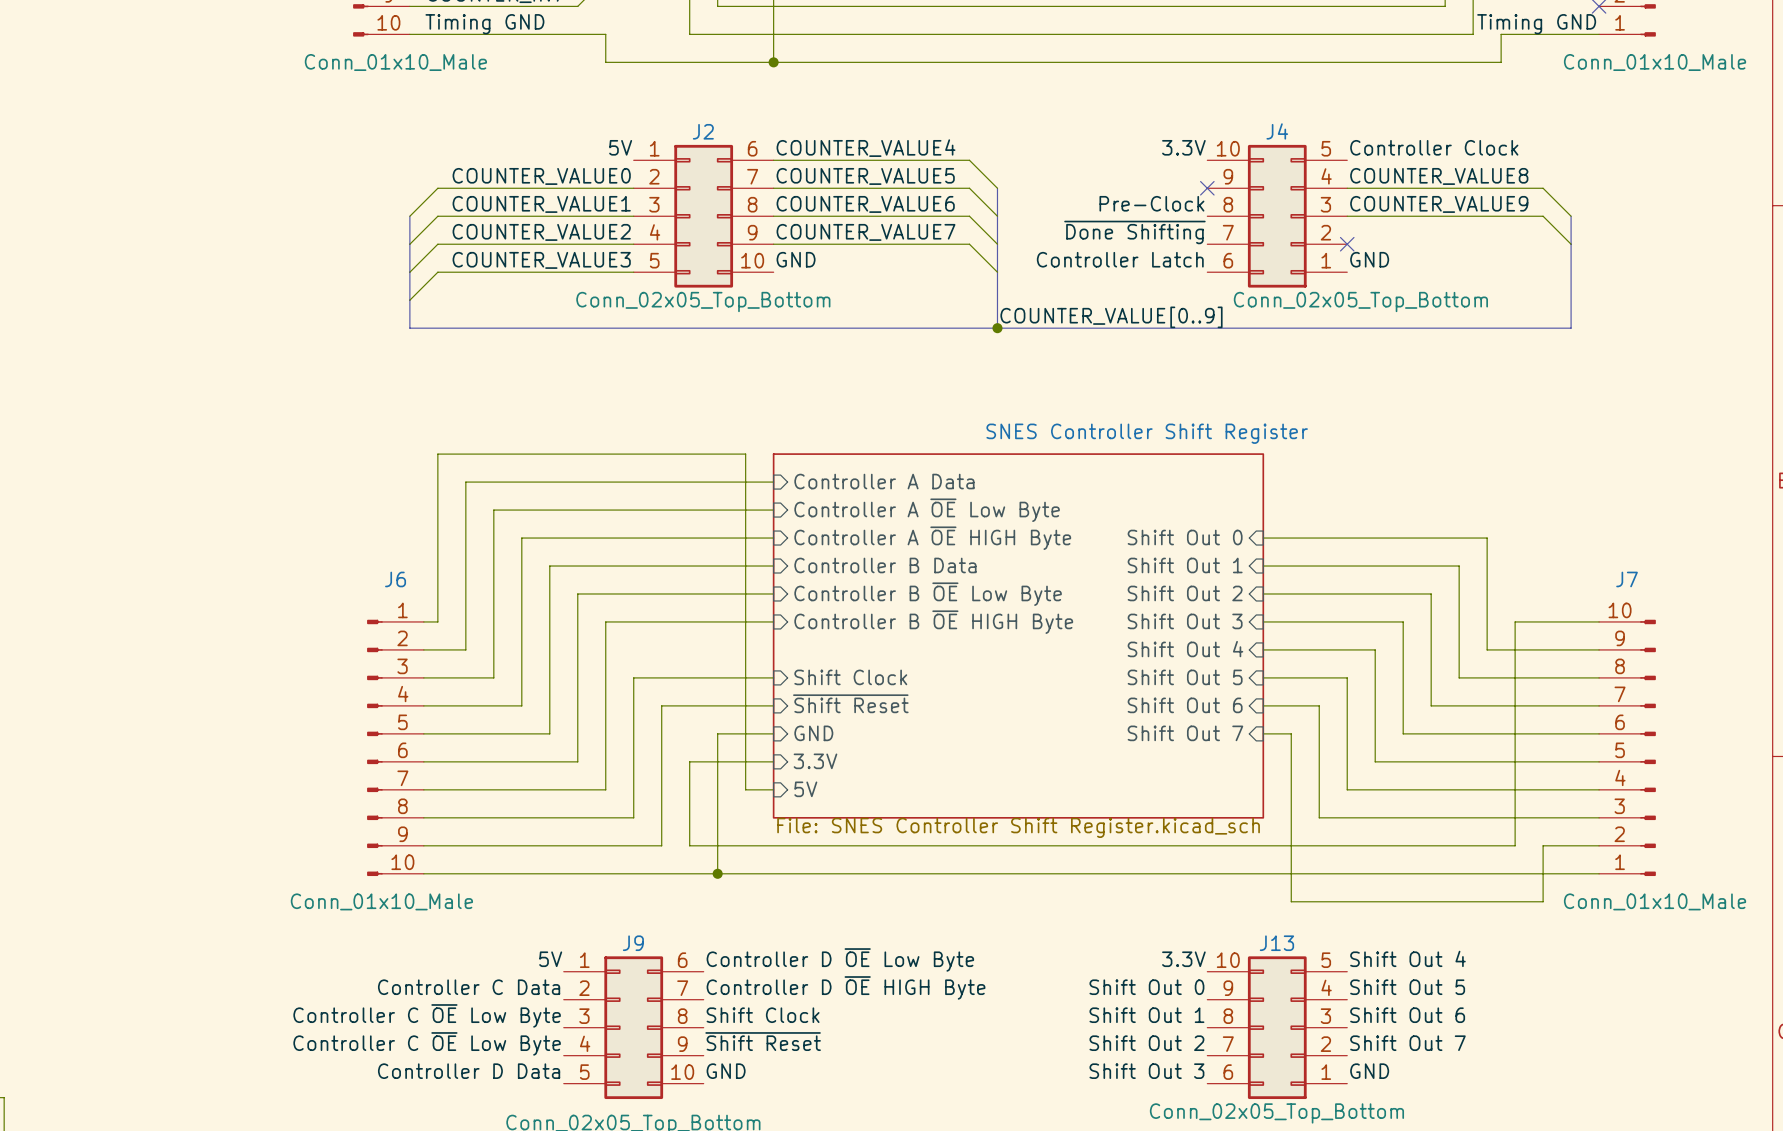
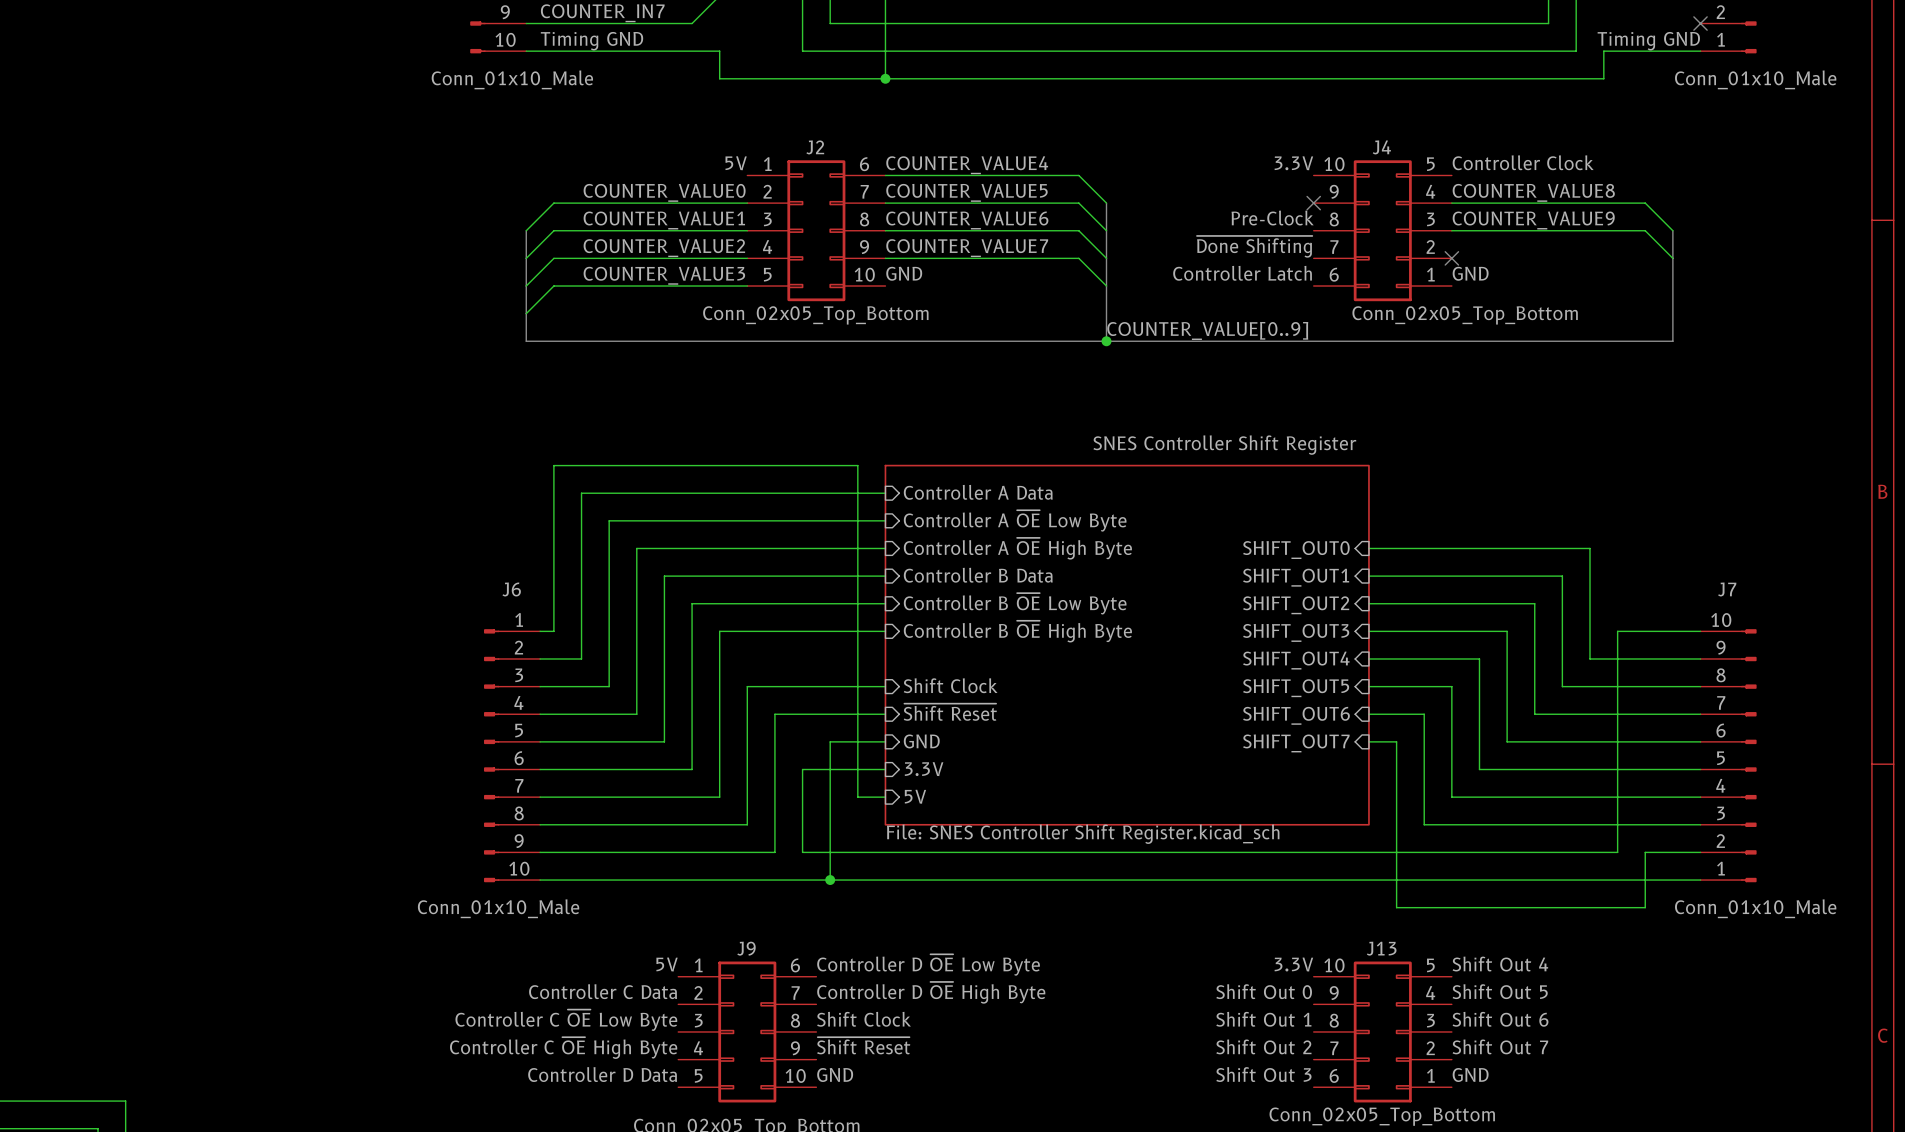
sheet pin: Shift Out 0 (1185, 537) -> SHIFT_OUT0 (1296, 550)
sheet pin: Controller A ~{OE} HIGH Byte (932, 538) -> Controller A ~{OE} High Byte (1017, 548)
sheet pin: Shift Out 1 (1185, 565) -> SHIFT_OUT1 (1296, 577)
sheet pin: Shift Out 2 (1185, 593) -> SHIFT_OUT2 (1296, 605)
sheet pin: Shift Out 3 (1185, 621) -> SHIFT_OUT3 (1296, 632)
sheet pin: Controller B ~{OE} HIGH Byte (933, 622) -> Controller B ~{OE} High Byte (1017, 631)
sheet pin: Shift Out 4 (1185, 649) -> SHIFT_OUT4 (1296, 660)
sheet pin: Shift Out 5 (1185, 677) -> SHIFT_OUT5 (1296, 688)
sheet pin: Shift Out 6 (1185, 705) -> SHIFT_OUT6 (1296, 715)
sheet pin: Shift Out 7 (1185, 733) -> SHIFT_OUT7 (1296, 743)
label: Controller D ~{OE} HIGH Byte (846, 987) -> Controller D ~{OE} High Byte (931, 992)
label: Controller C ~{OE} Low Byte (427, 1043) -> Controller C ~{OE} High Byte (563, 1048)

